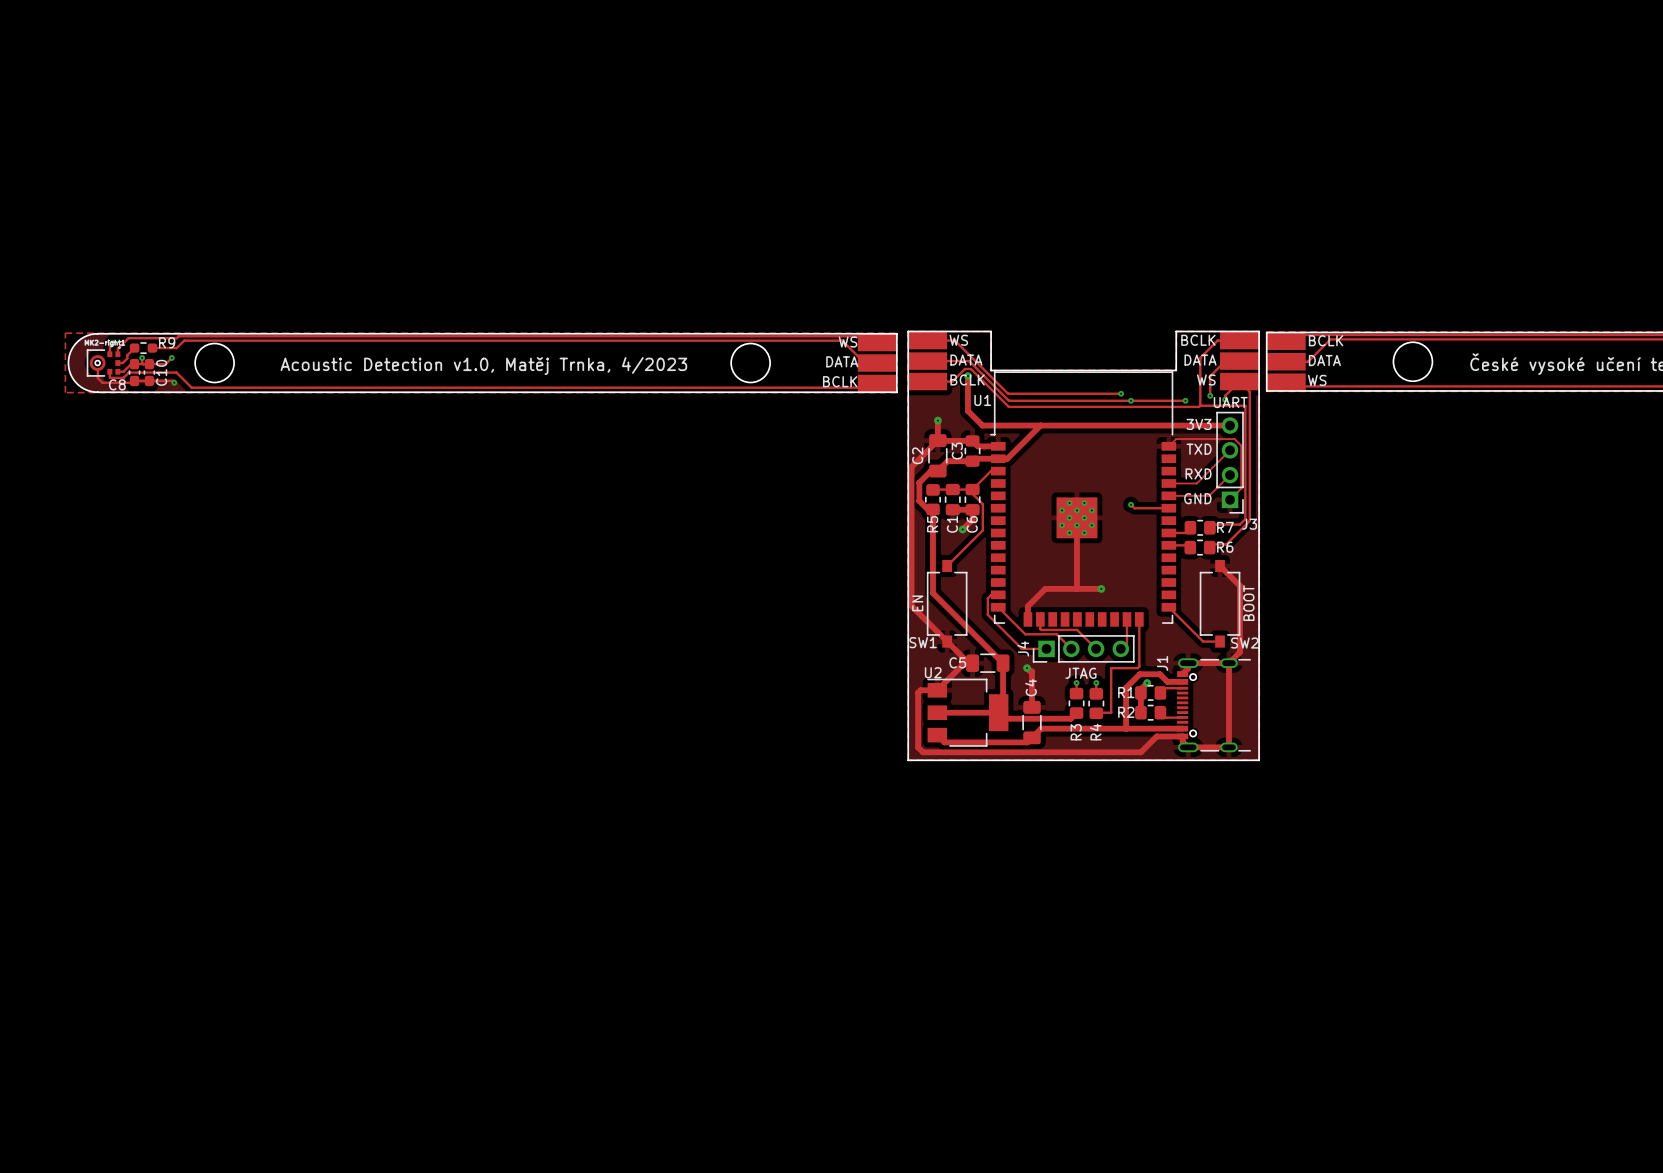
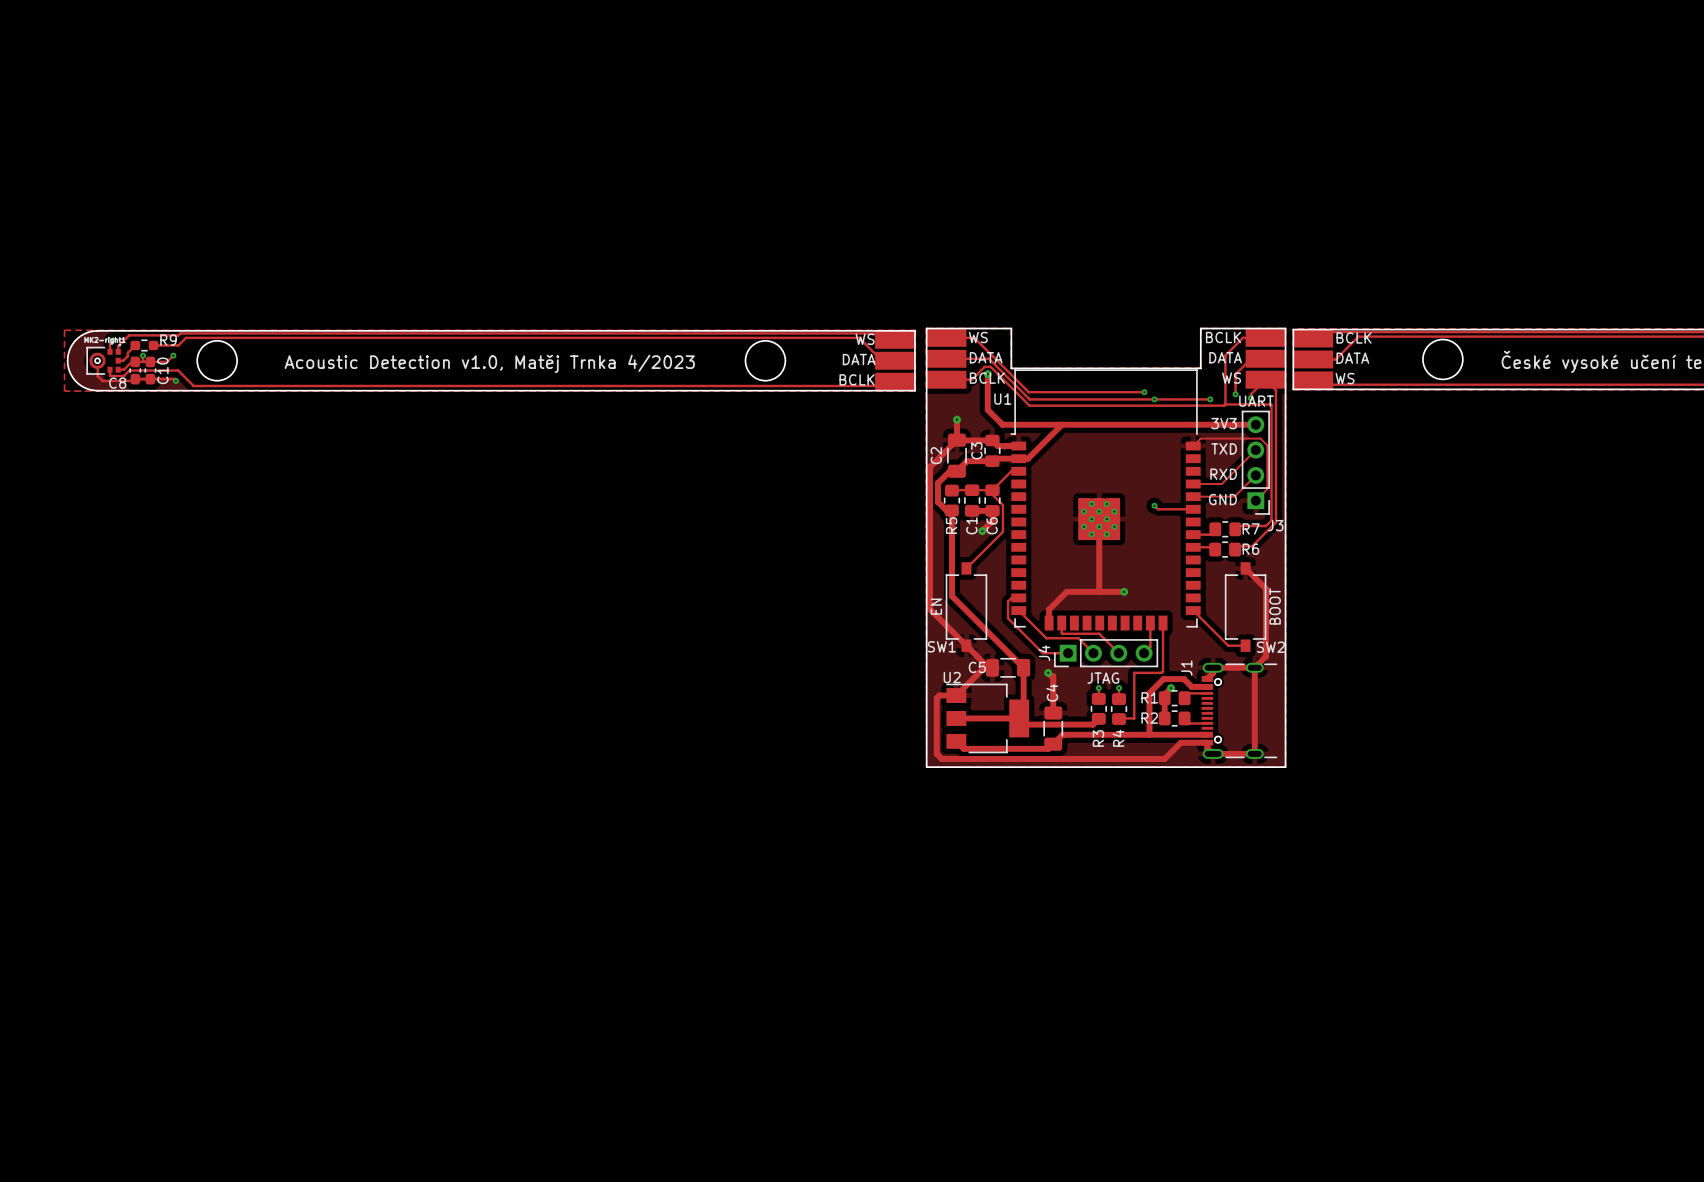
text: Acoustic Detection v1.0, Matěj Trnka, 4/2023 (483, 366) -> Acoustic Detection v1.0, Matěj Trnka 4/2023 (489, 363)

